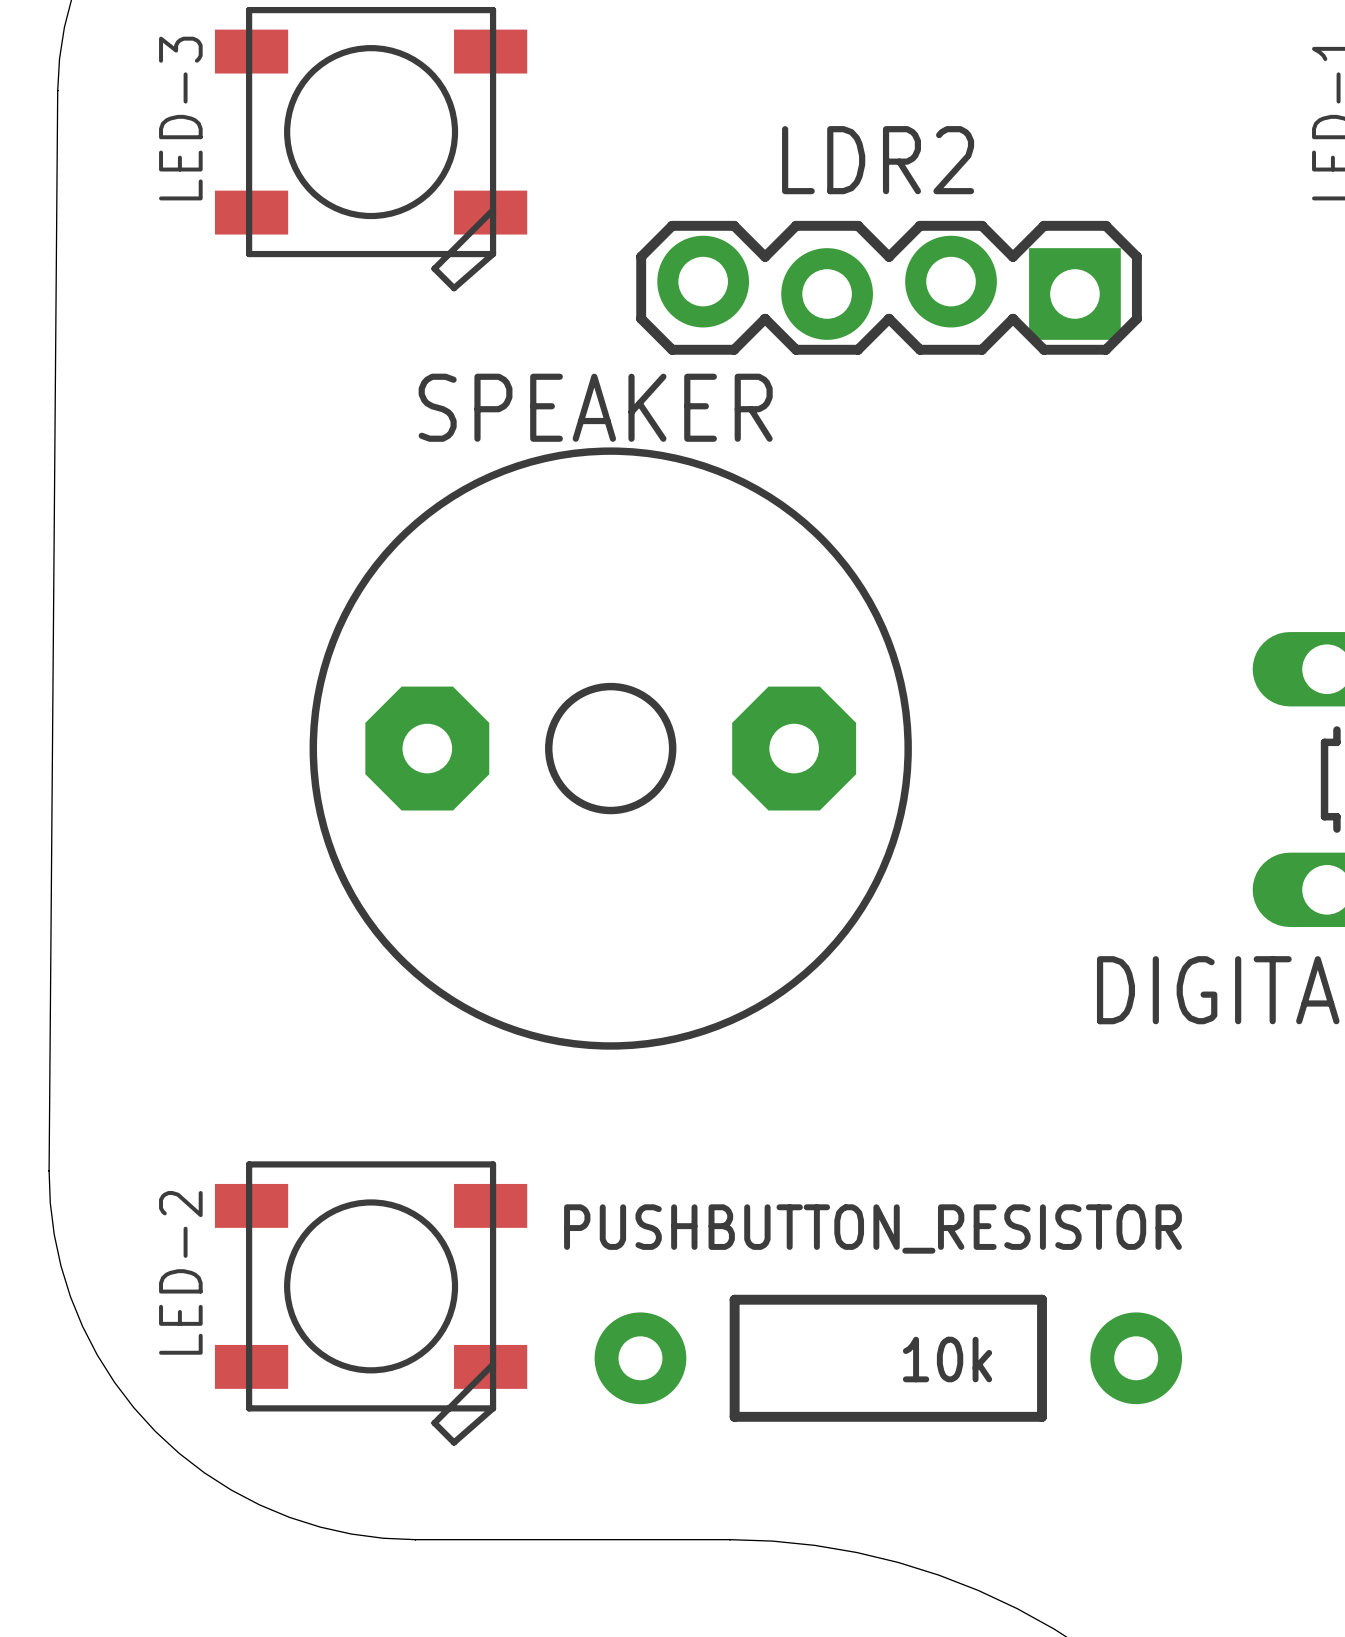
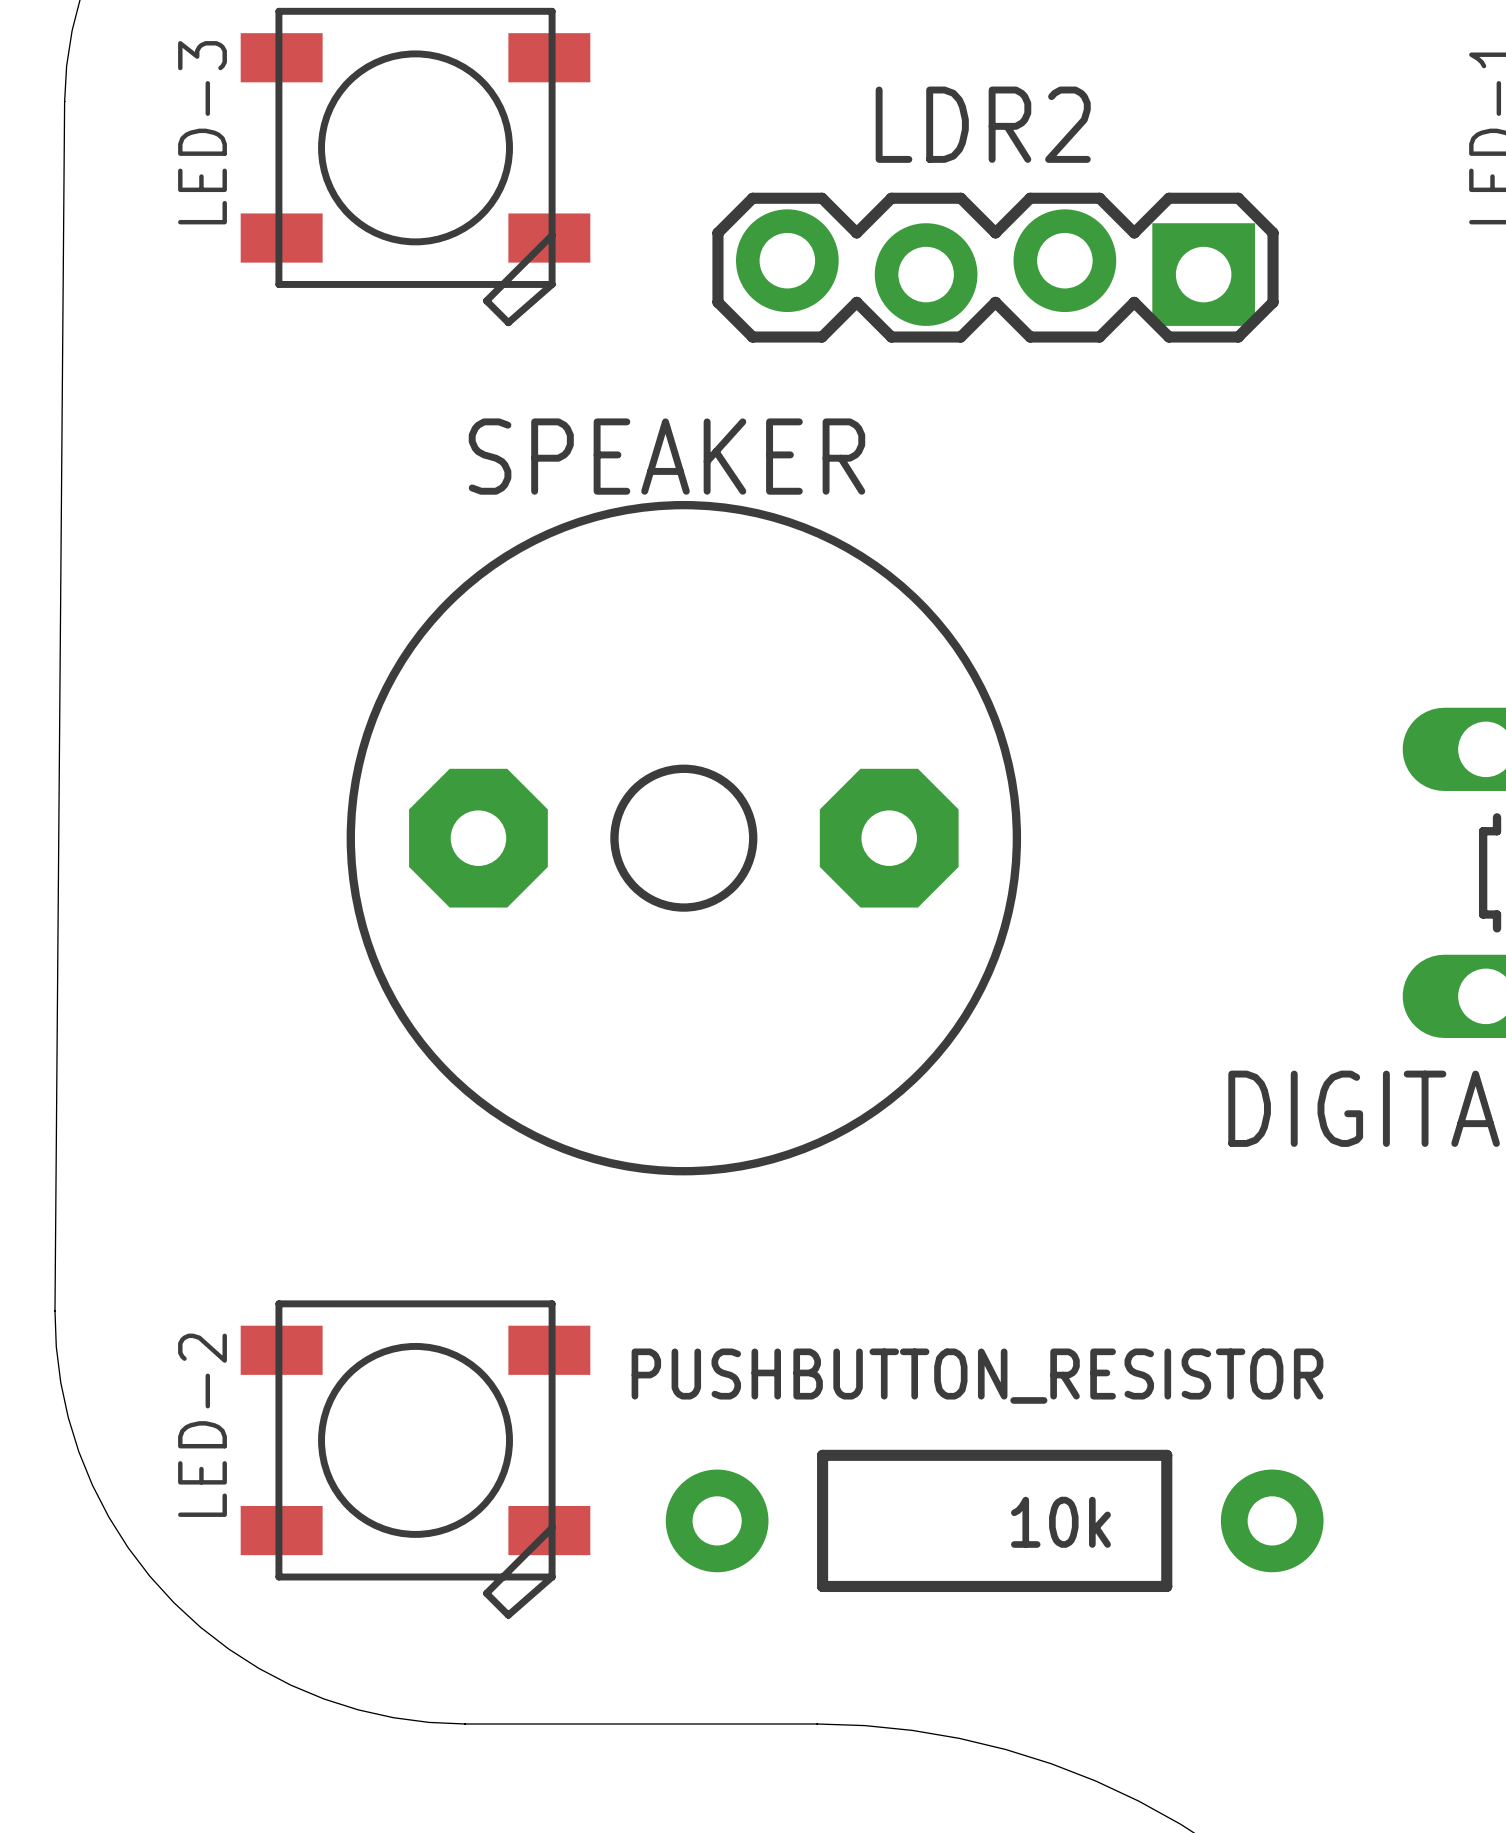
LDR2 position: (889, 287) -> (995, 267)

